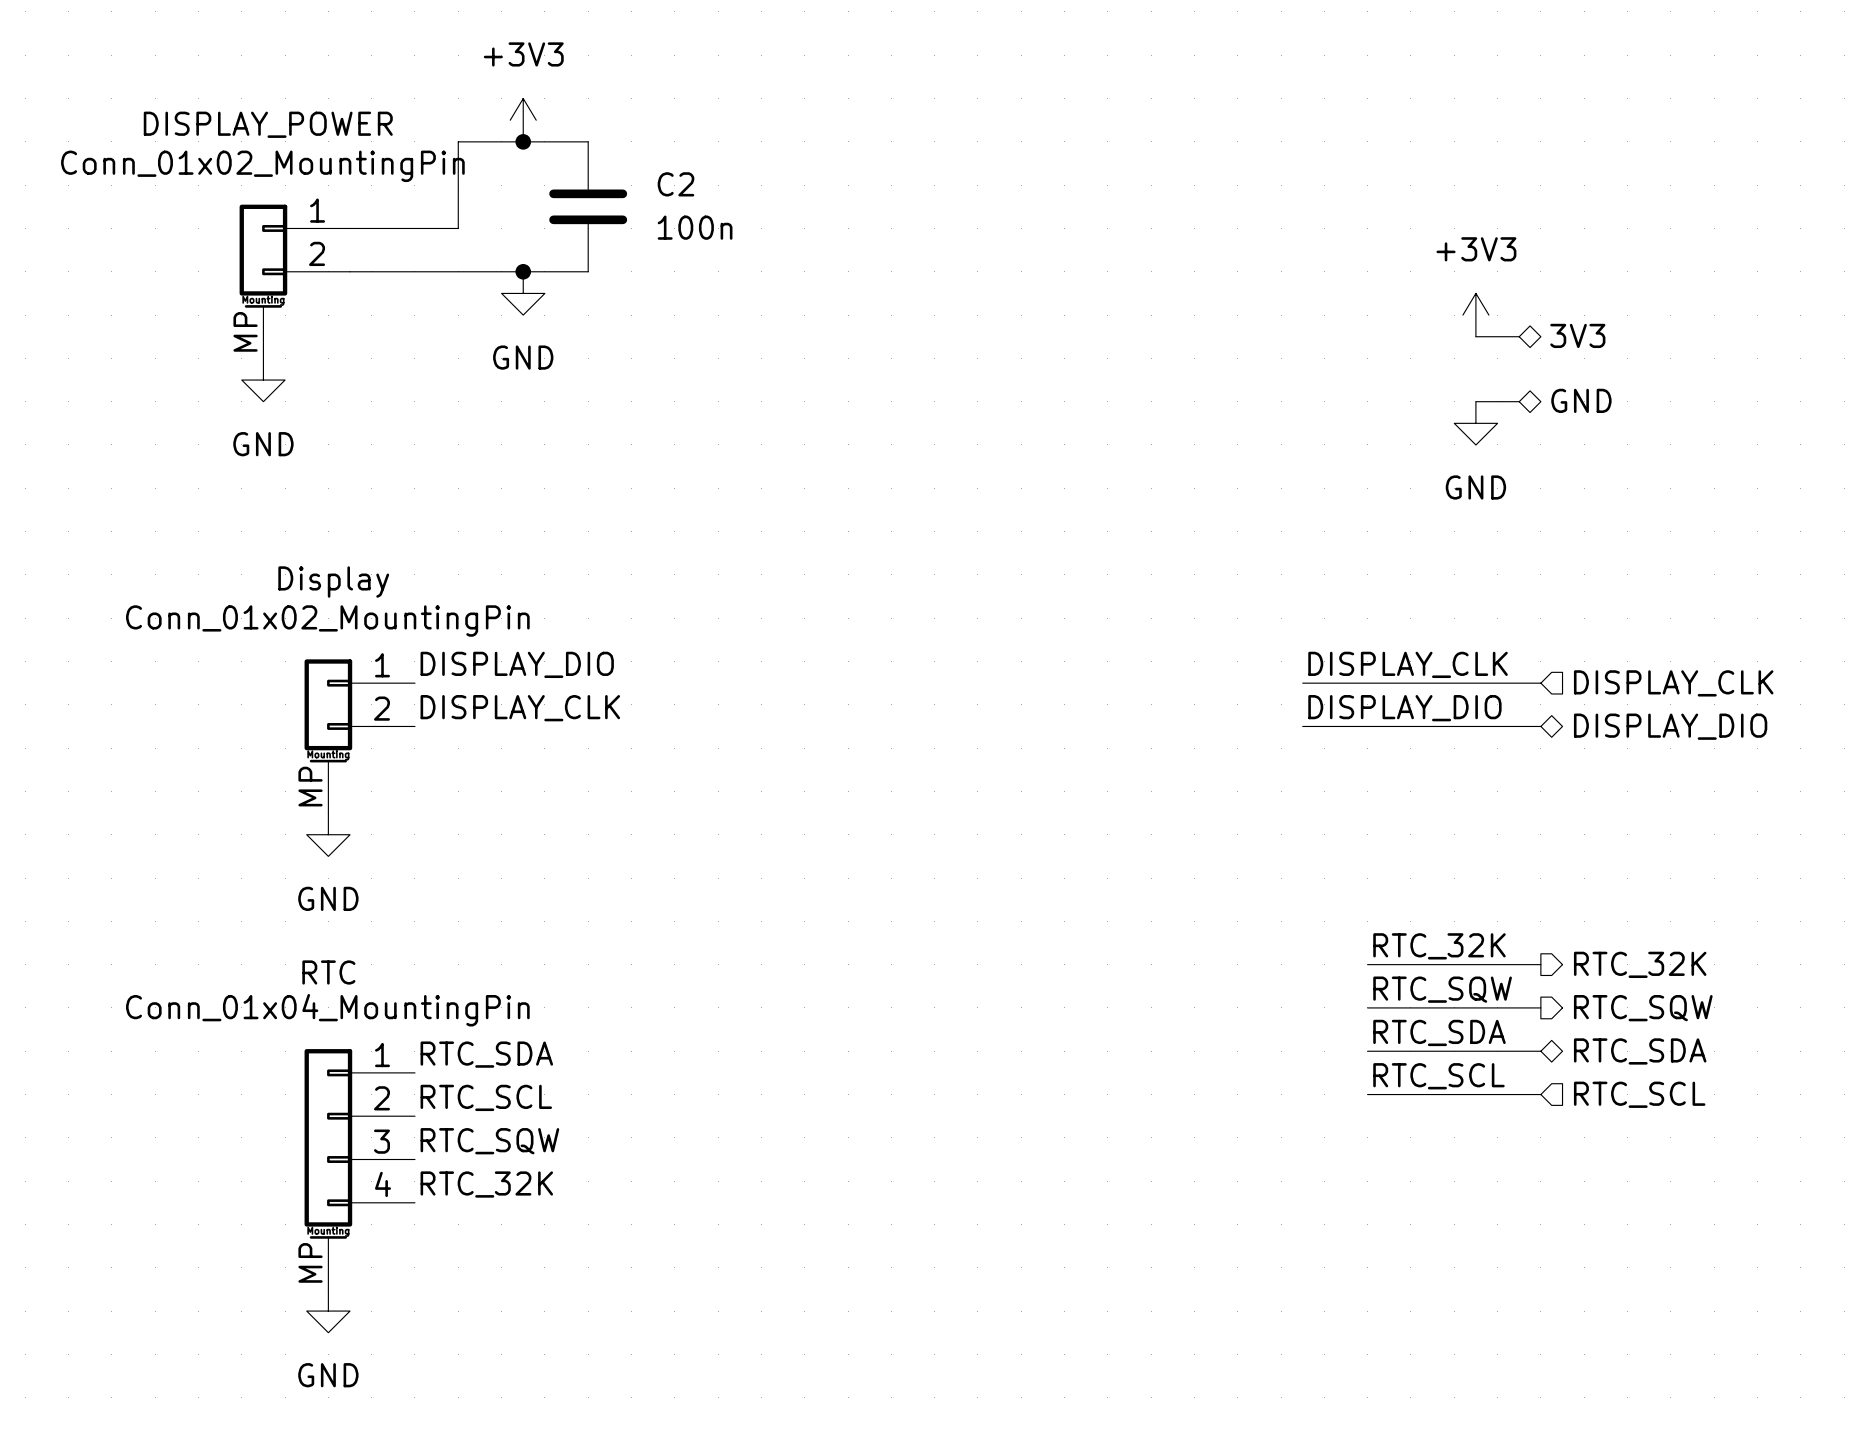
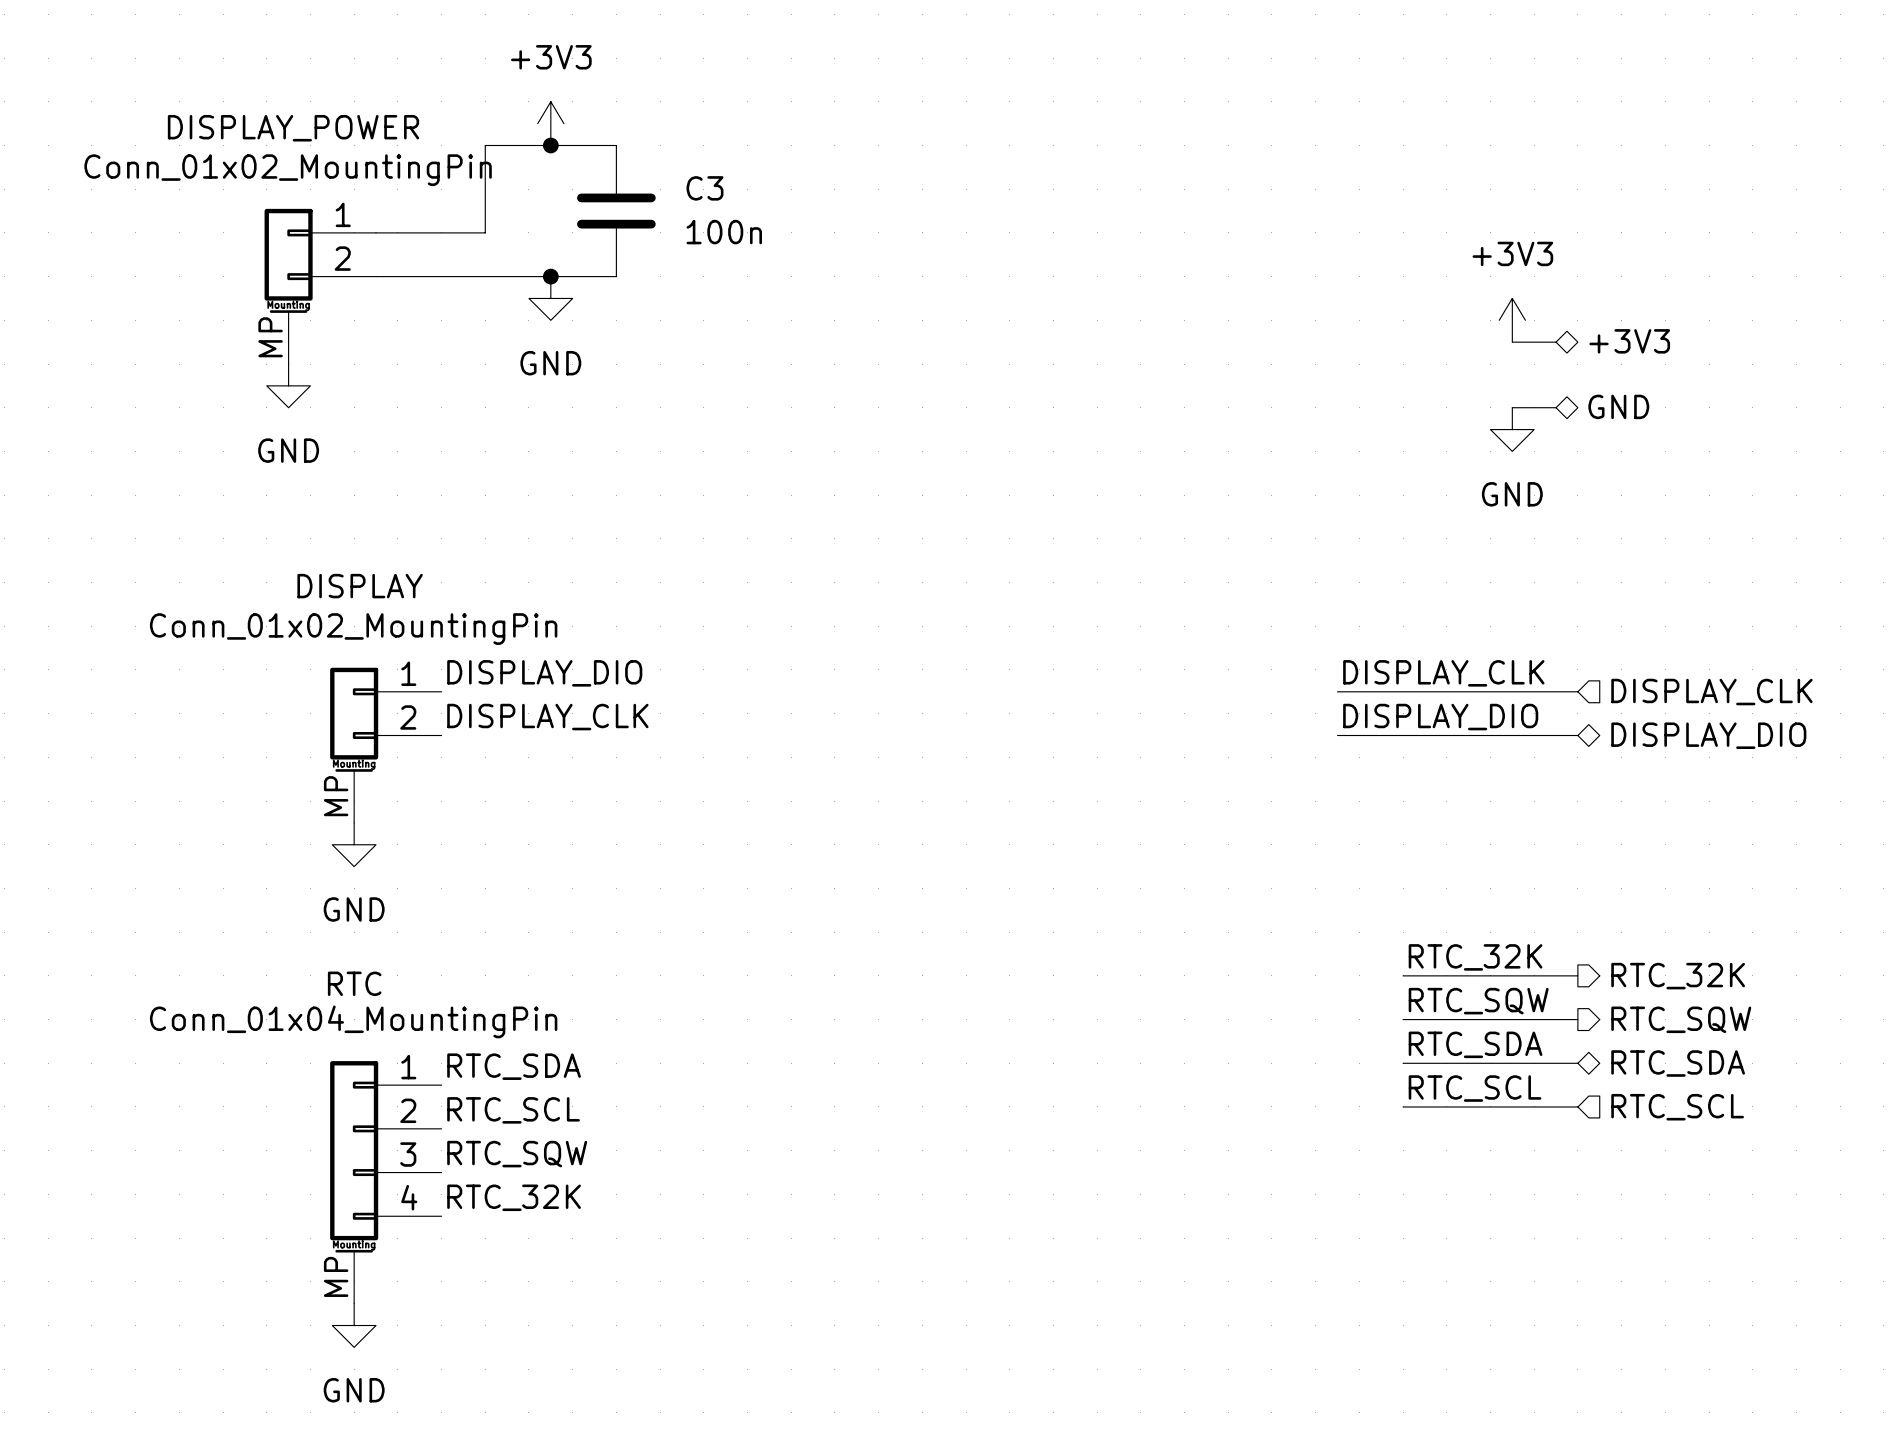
C2 name: C2 (676, 184) -> C3 (705, 188)
hierarchical label: 3V3 (1577, 335) -> +3V3 (1629, 341)
part text: Display (333, 582) -> DISPLAY (360, 586)

